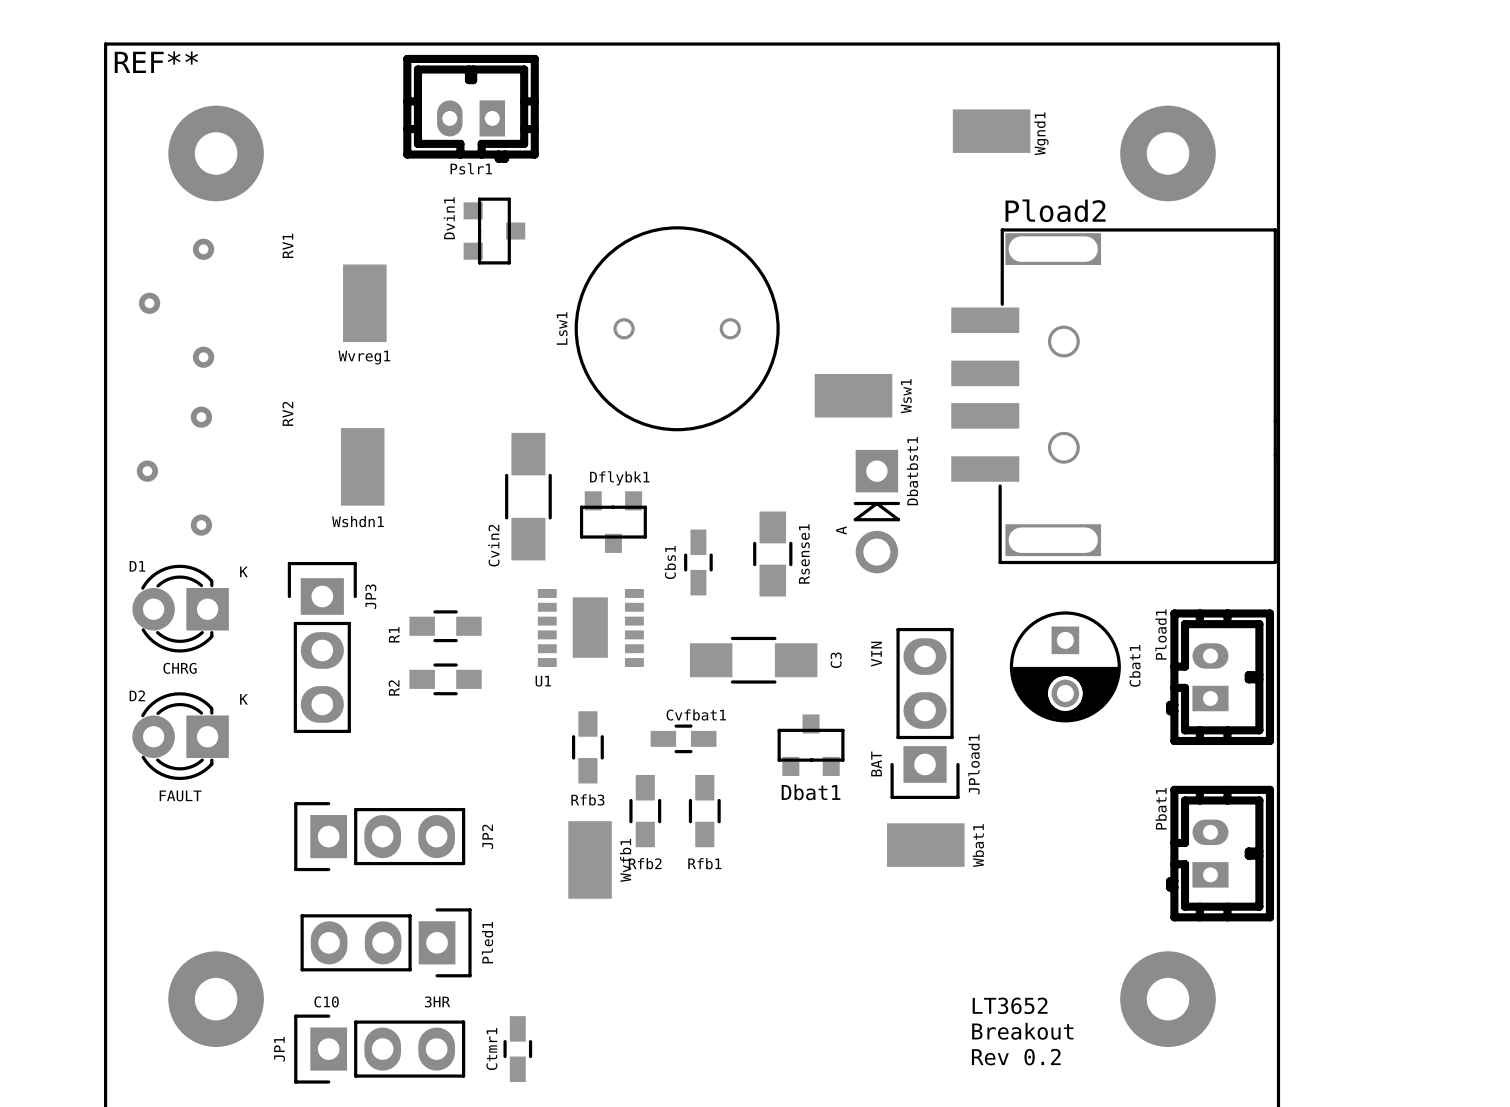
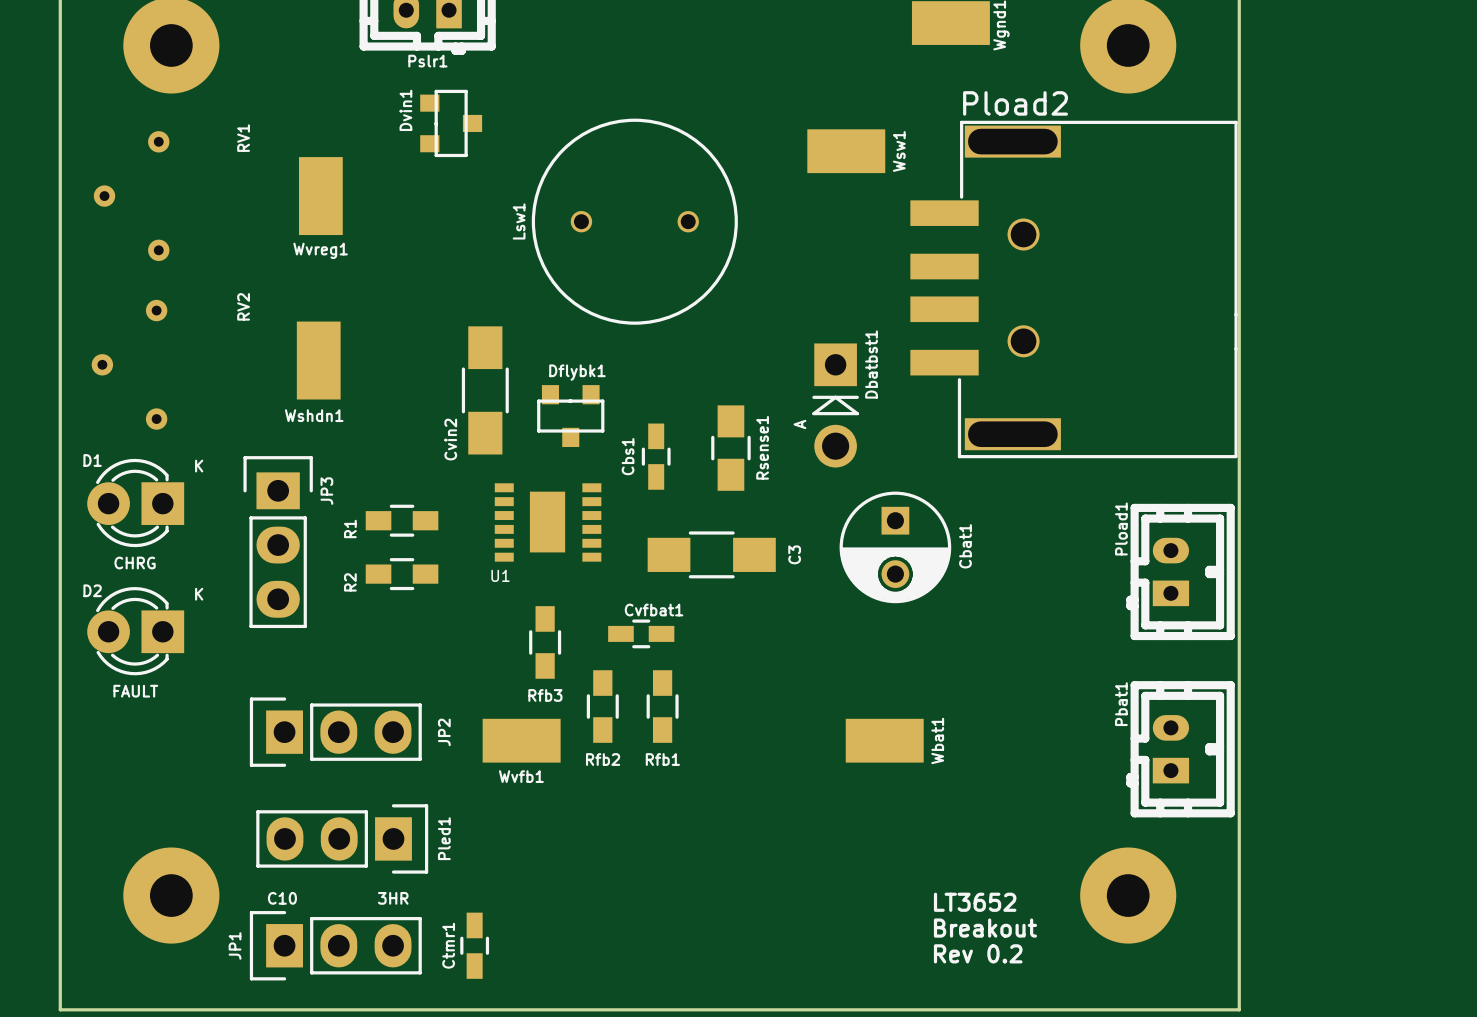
Wsw1 position: (853, 395) -> (846, 151)
text: VIN (876, 654) -> none
Cbat1 position: (1065, 666) -> (895, 547)
JPload1: (925, 713) -> none
Dbat1: (811, 745) -> none
text: BAT (876, 763) -> none
Wvfb1 rotation: 0° (590, 859) -> 90° clockwise (521, 740)

